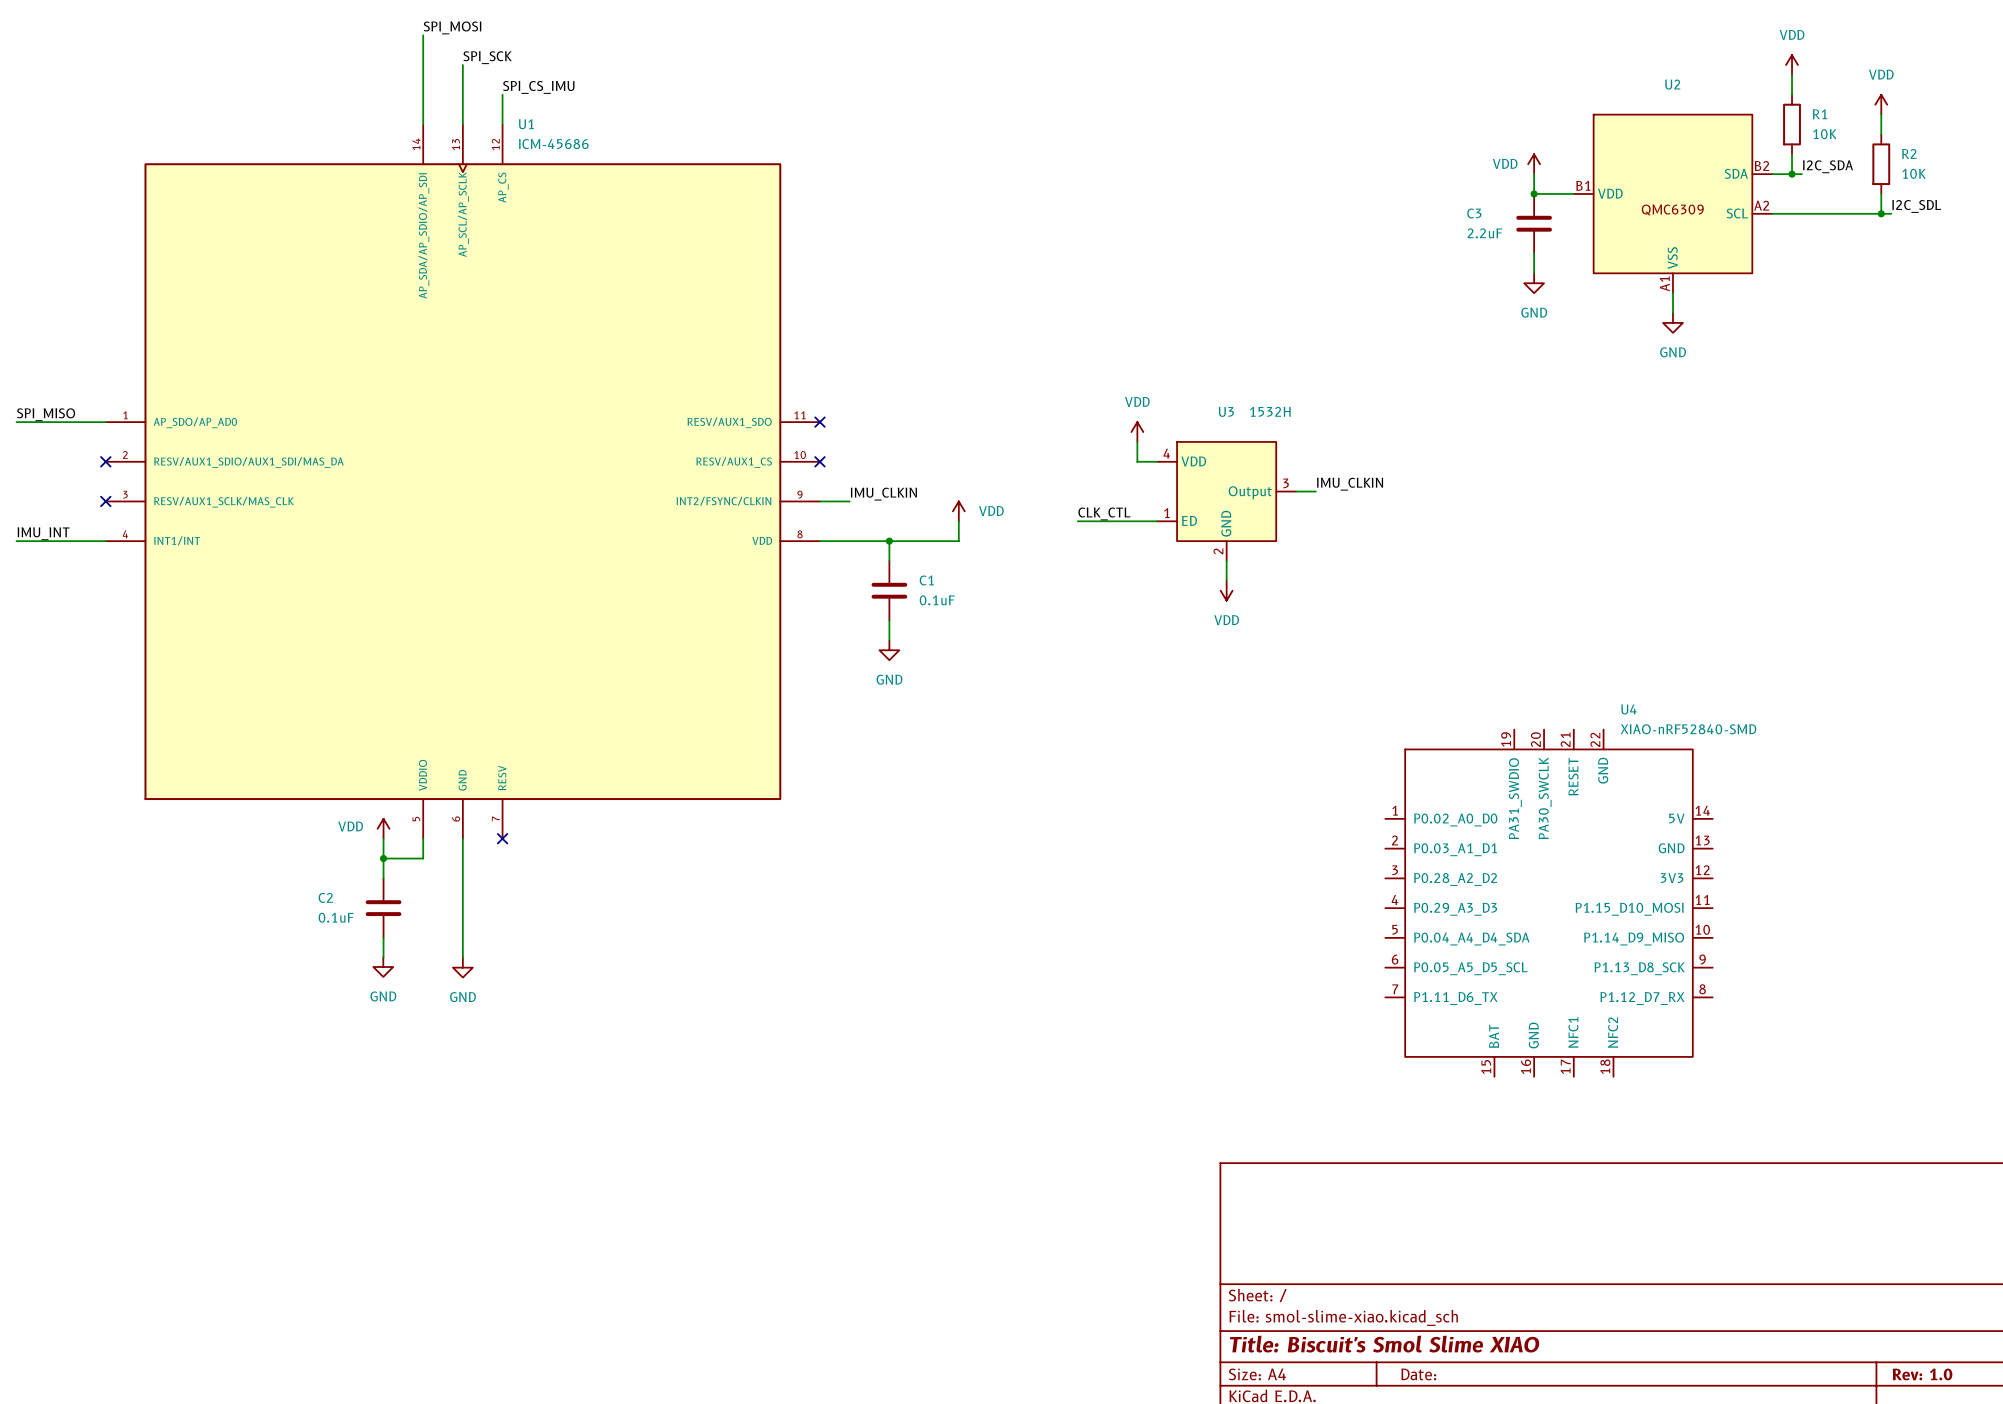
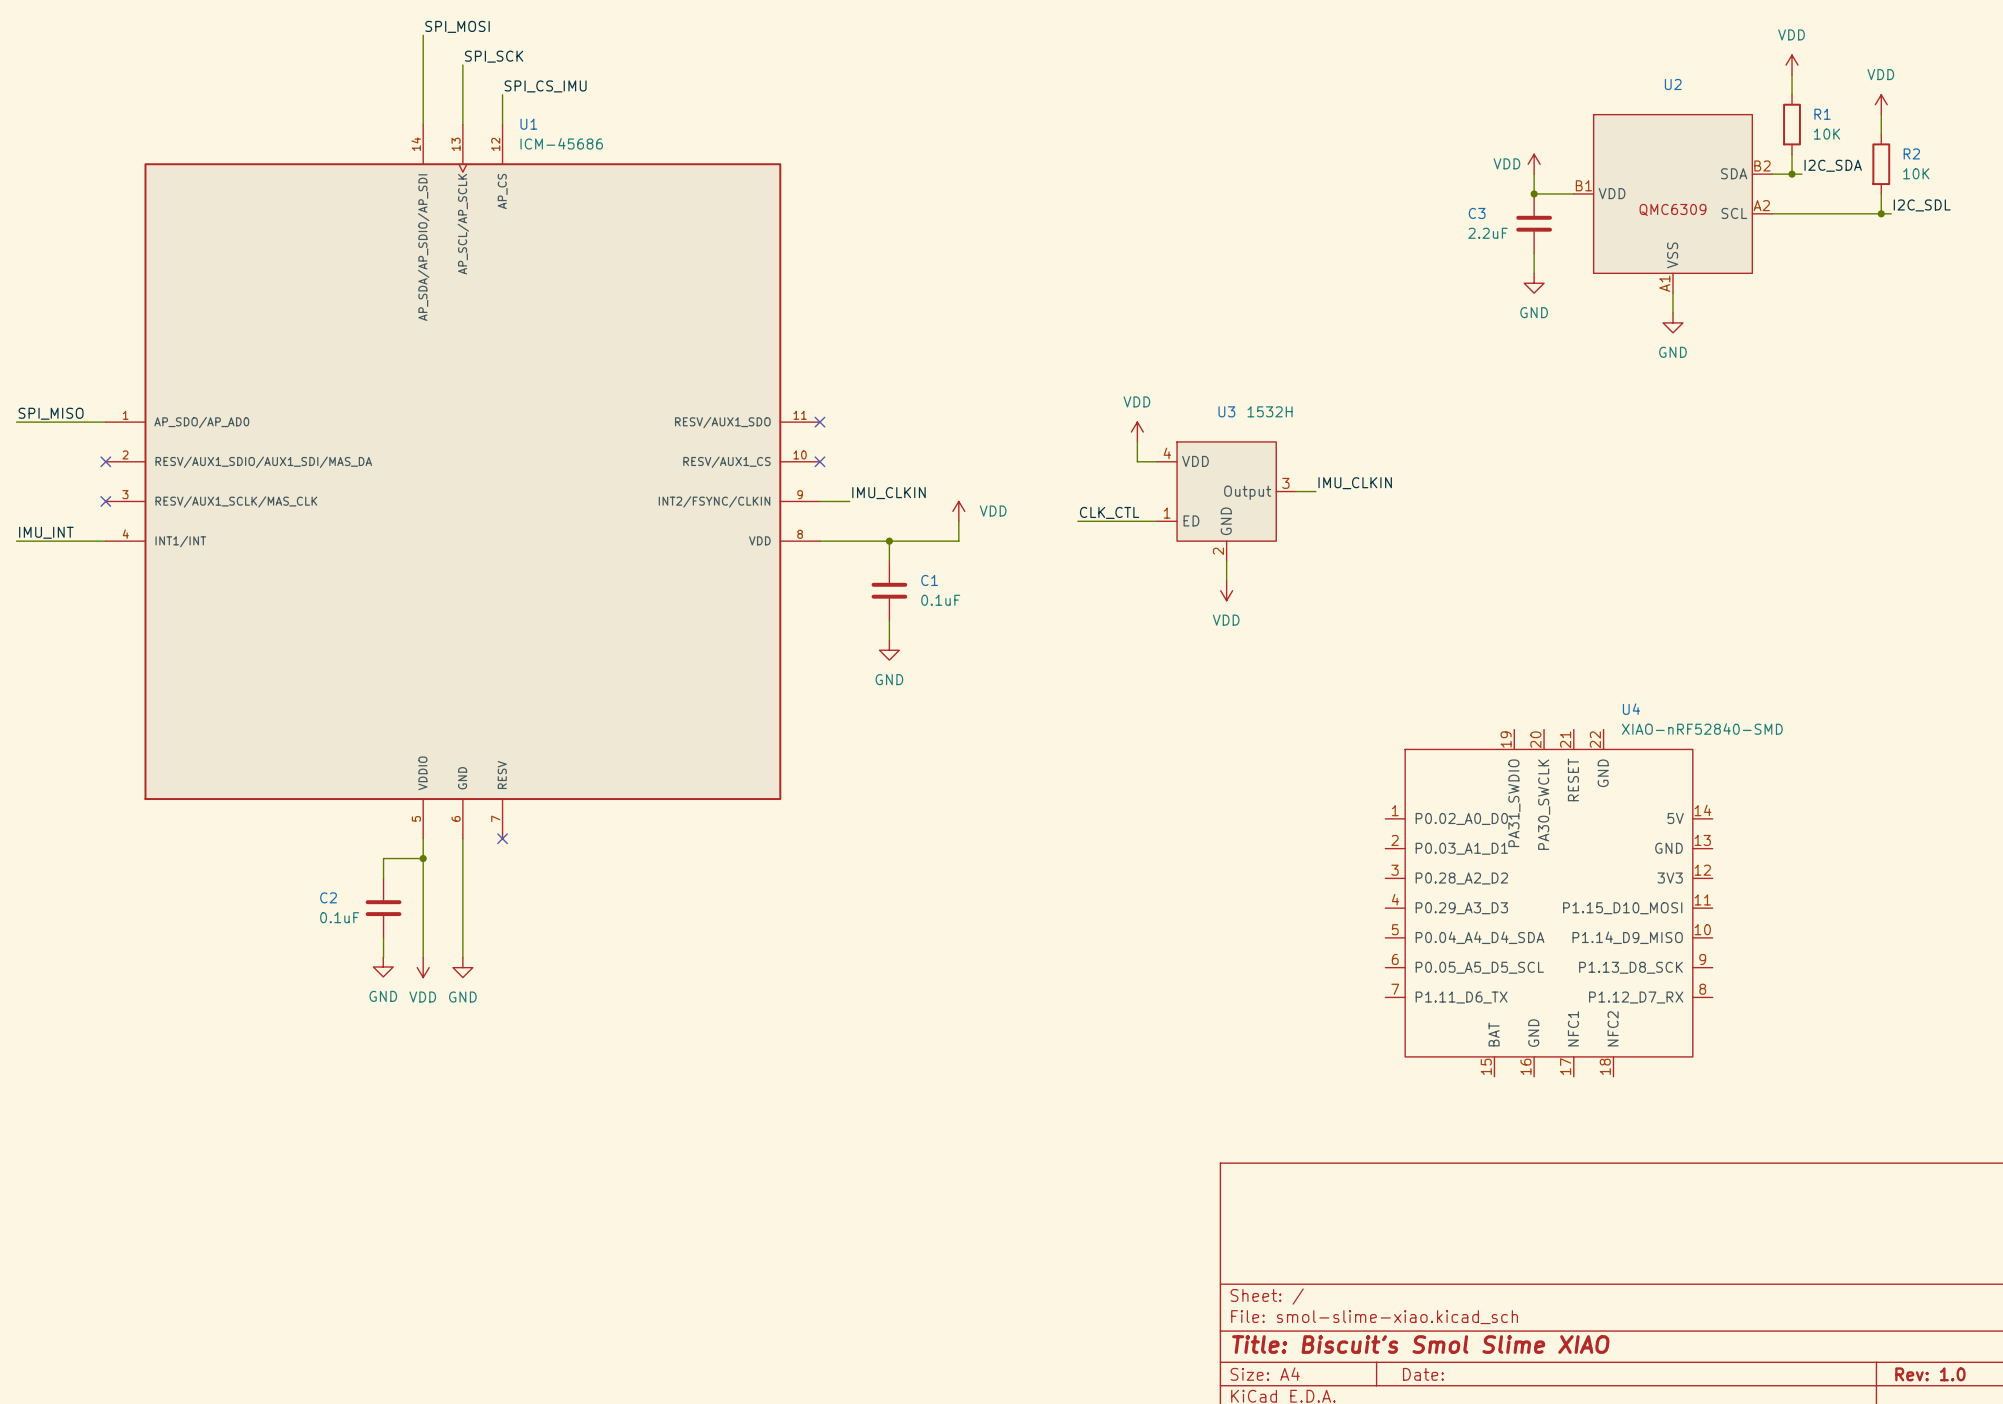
power symbol text position: VDD (350, 826) -> VDD (422, 997)
power symbol rotation: 0° (383, 828) -> 180° (423, 967)
power symbol position: VDD (383, 828) -> VDD (423, 967)
wire: (383, 838) (383, 858) -> none
junction position: (383, 858) -> (423, 858)
wire: none -> (423, 858) (423, 957)

